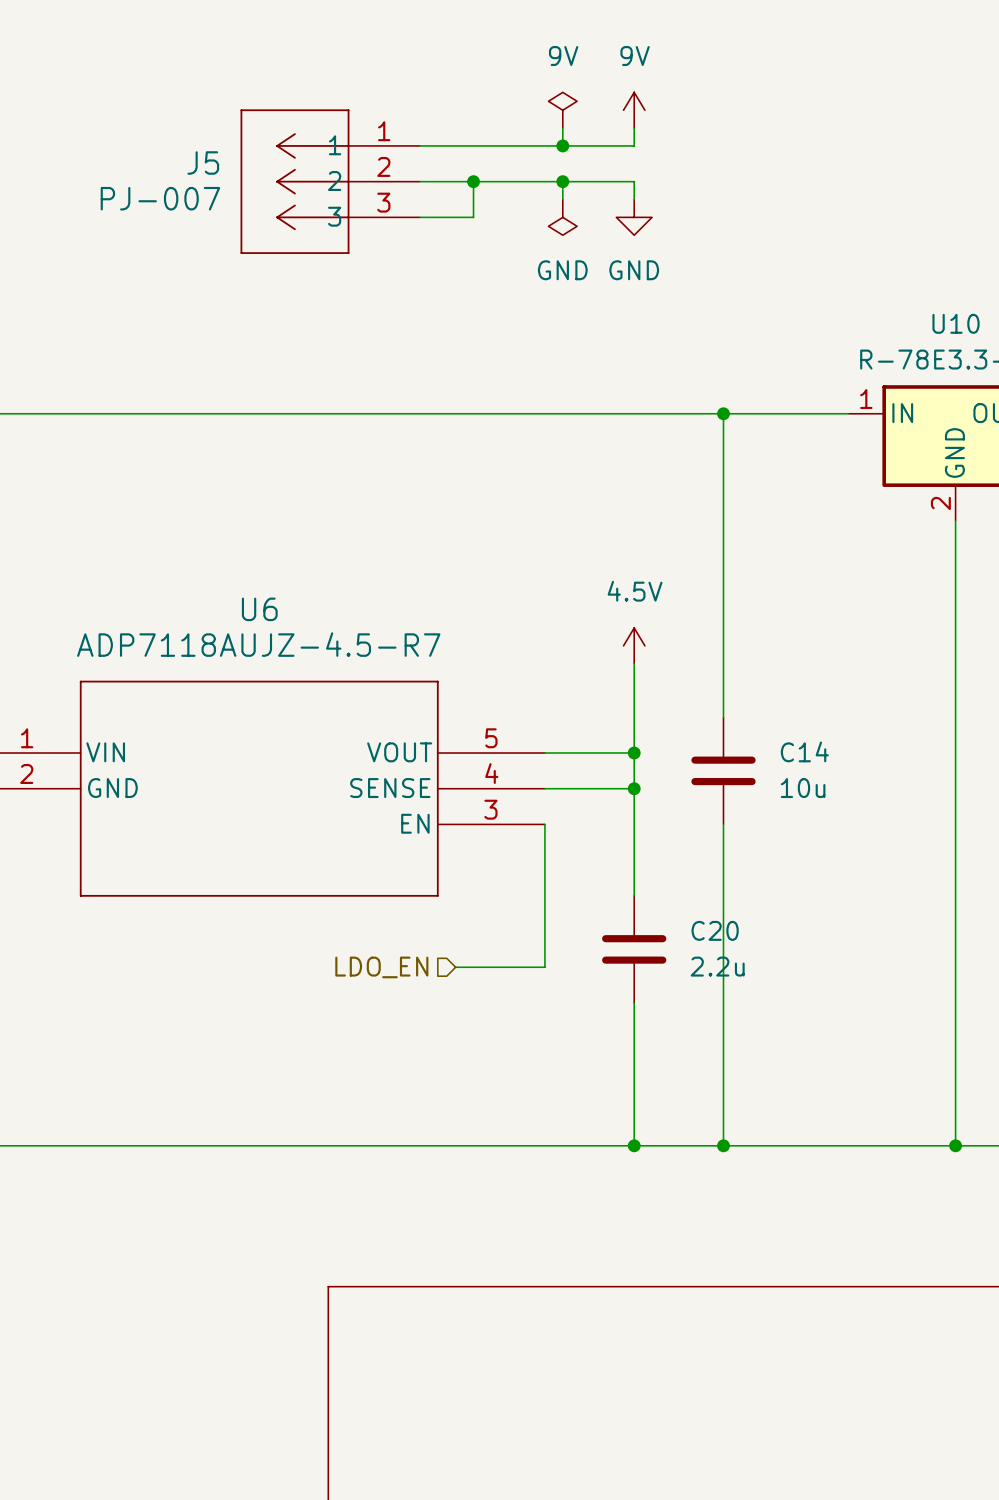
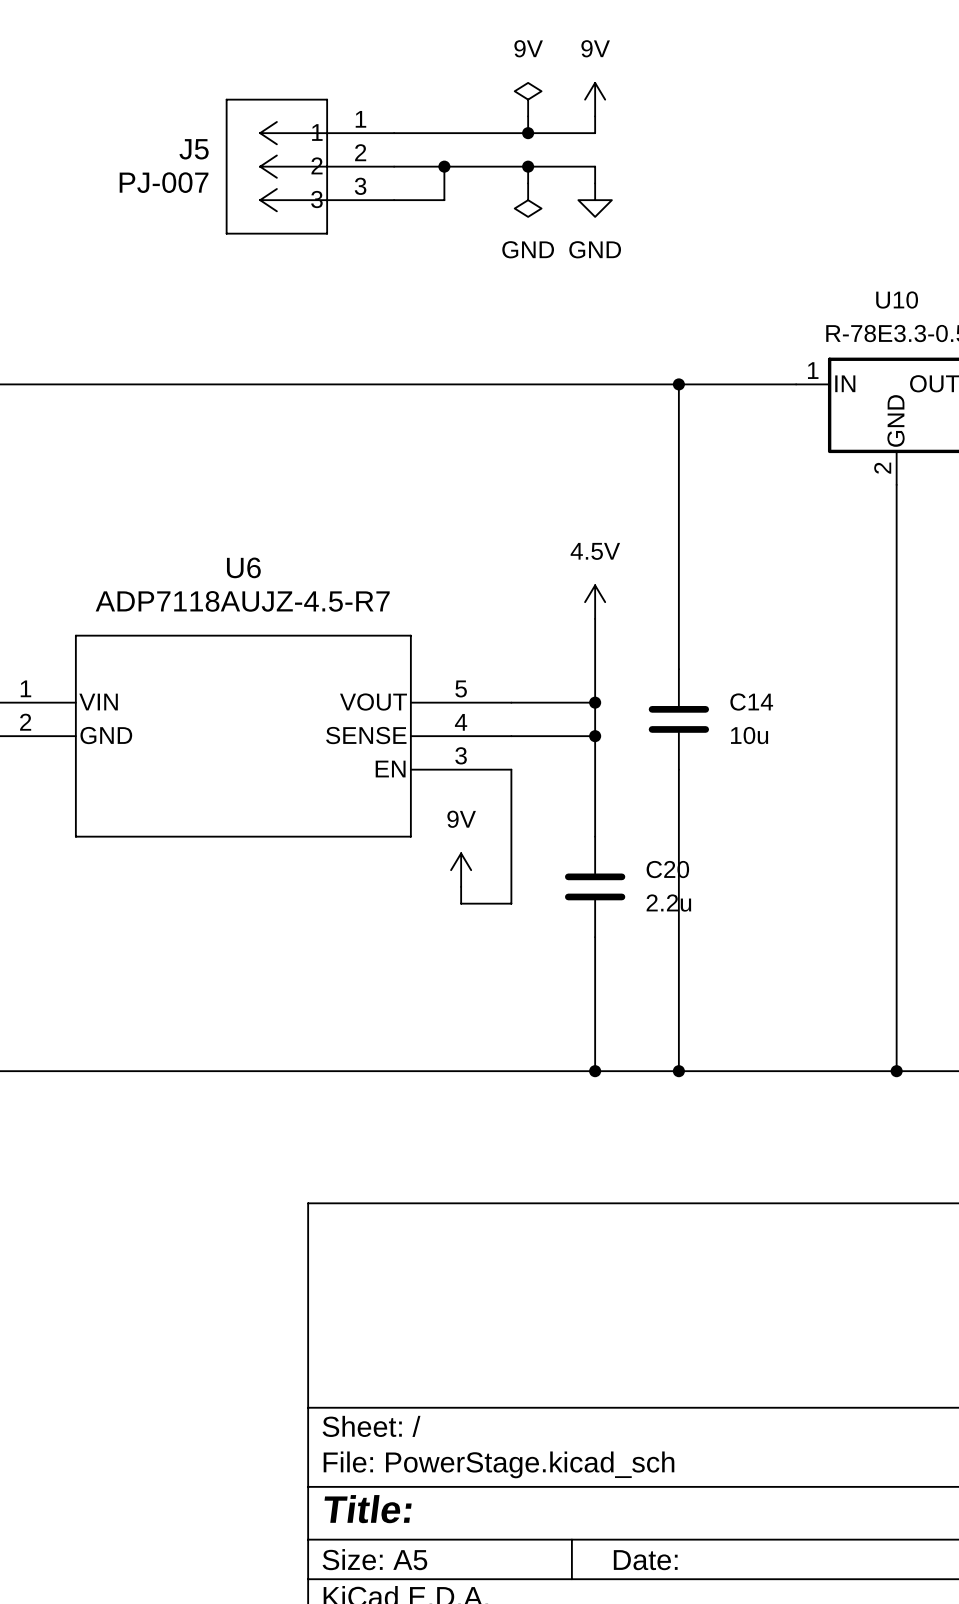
power symbol: none -> 9V (461, 870)
hierarchical label: LDO_EN (381, 967) -> none
wire: (455, 967) (491, 967) -> (461, 886) (461, 903)

